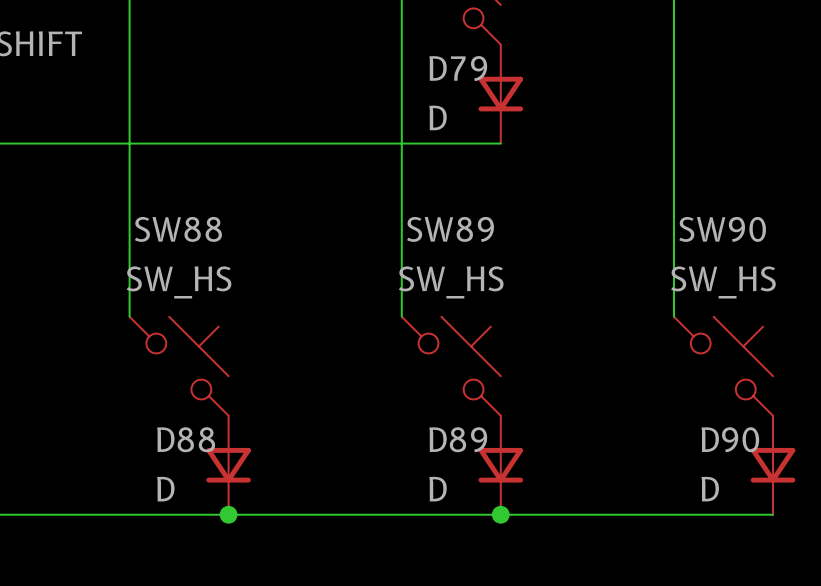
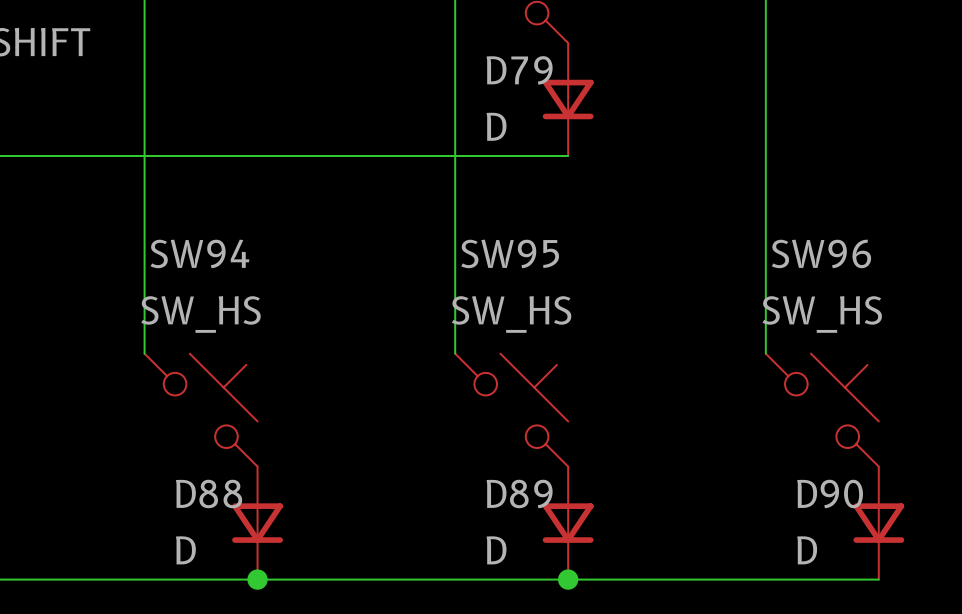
SW88 name: SW88 (178, 229) -> SW94 (199, 253)
SW89 name: SW89 (450, 229) -> SW95 (510, 253)
SW90 name: SW90 (722, 229) -> SW96 (821, 253)

